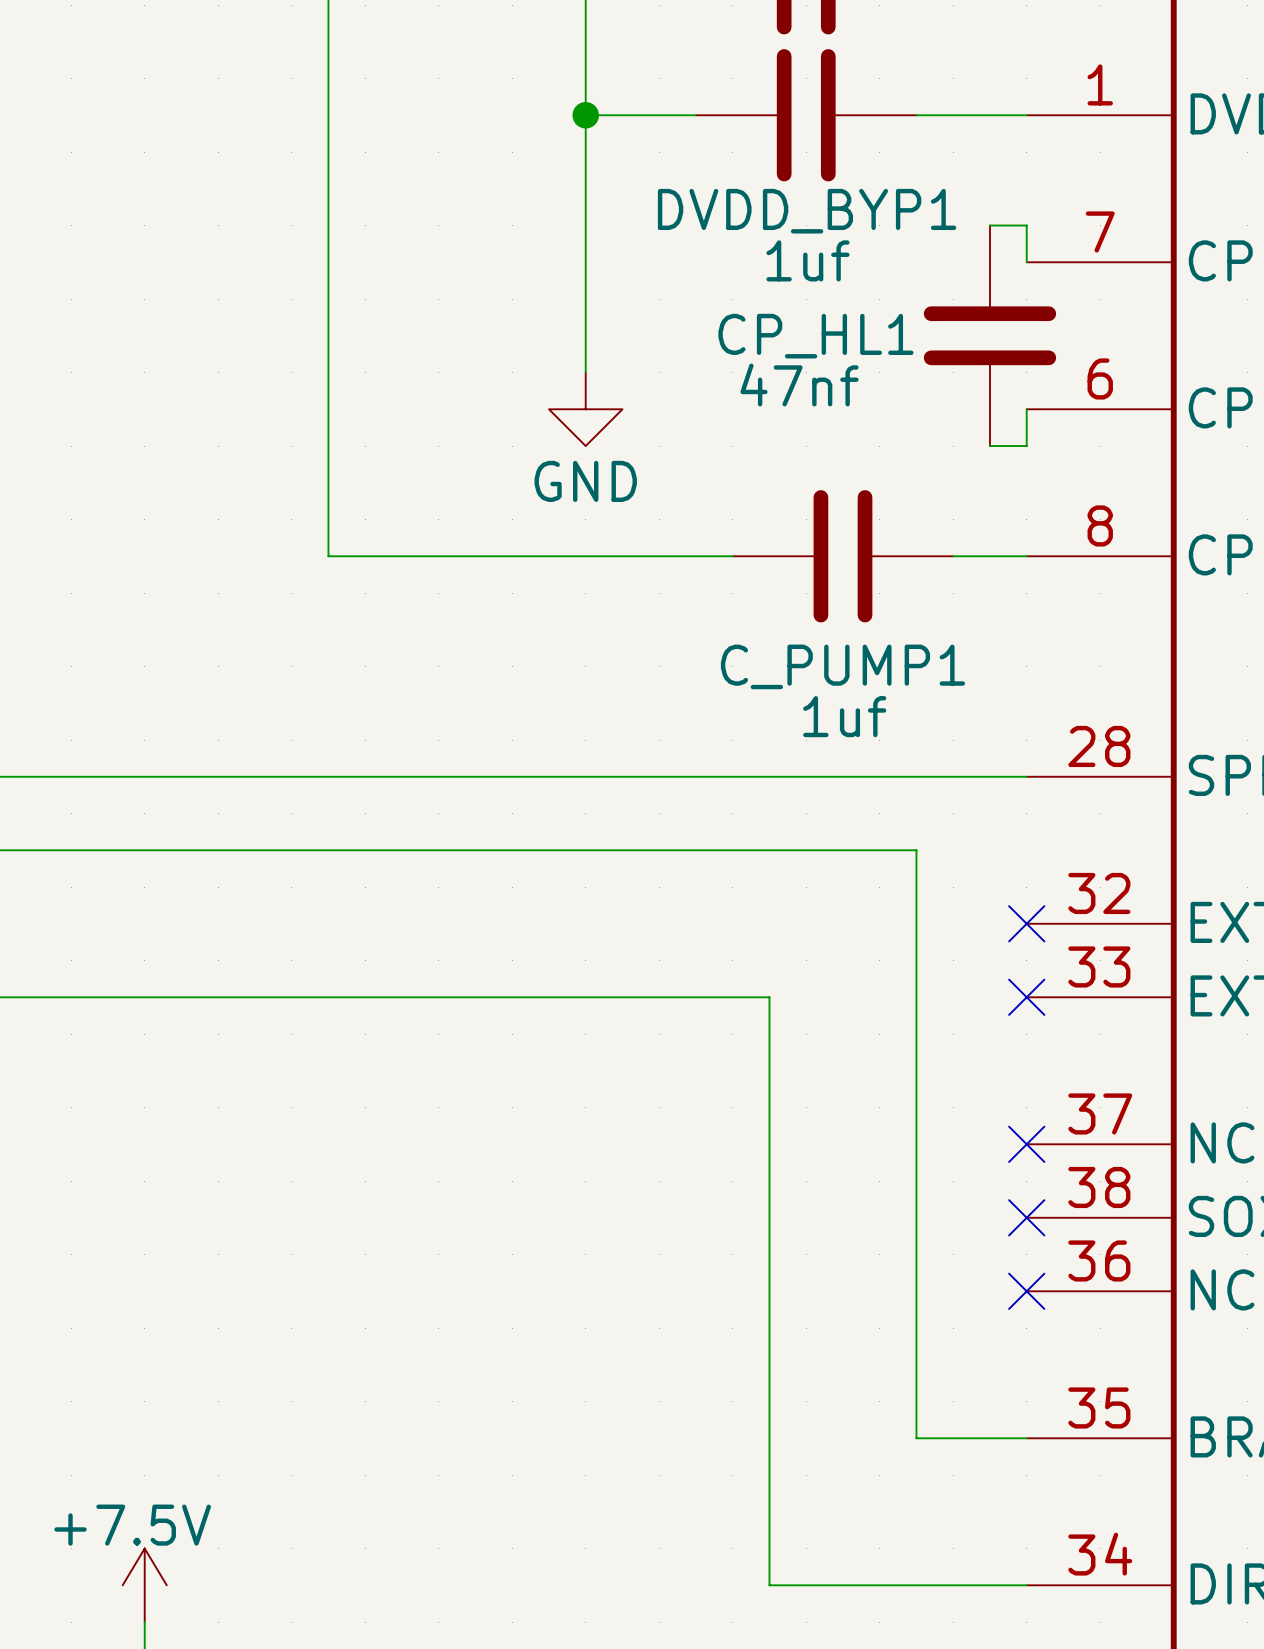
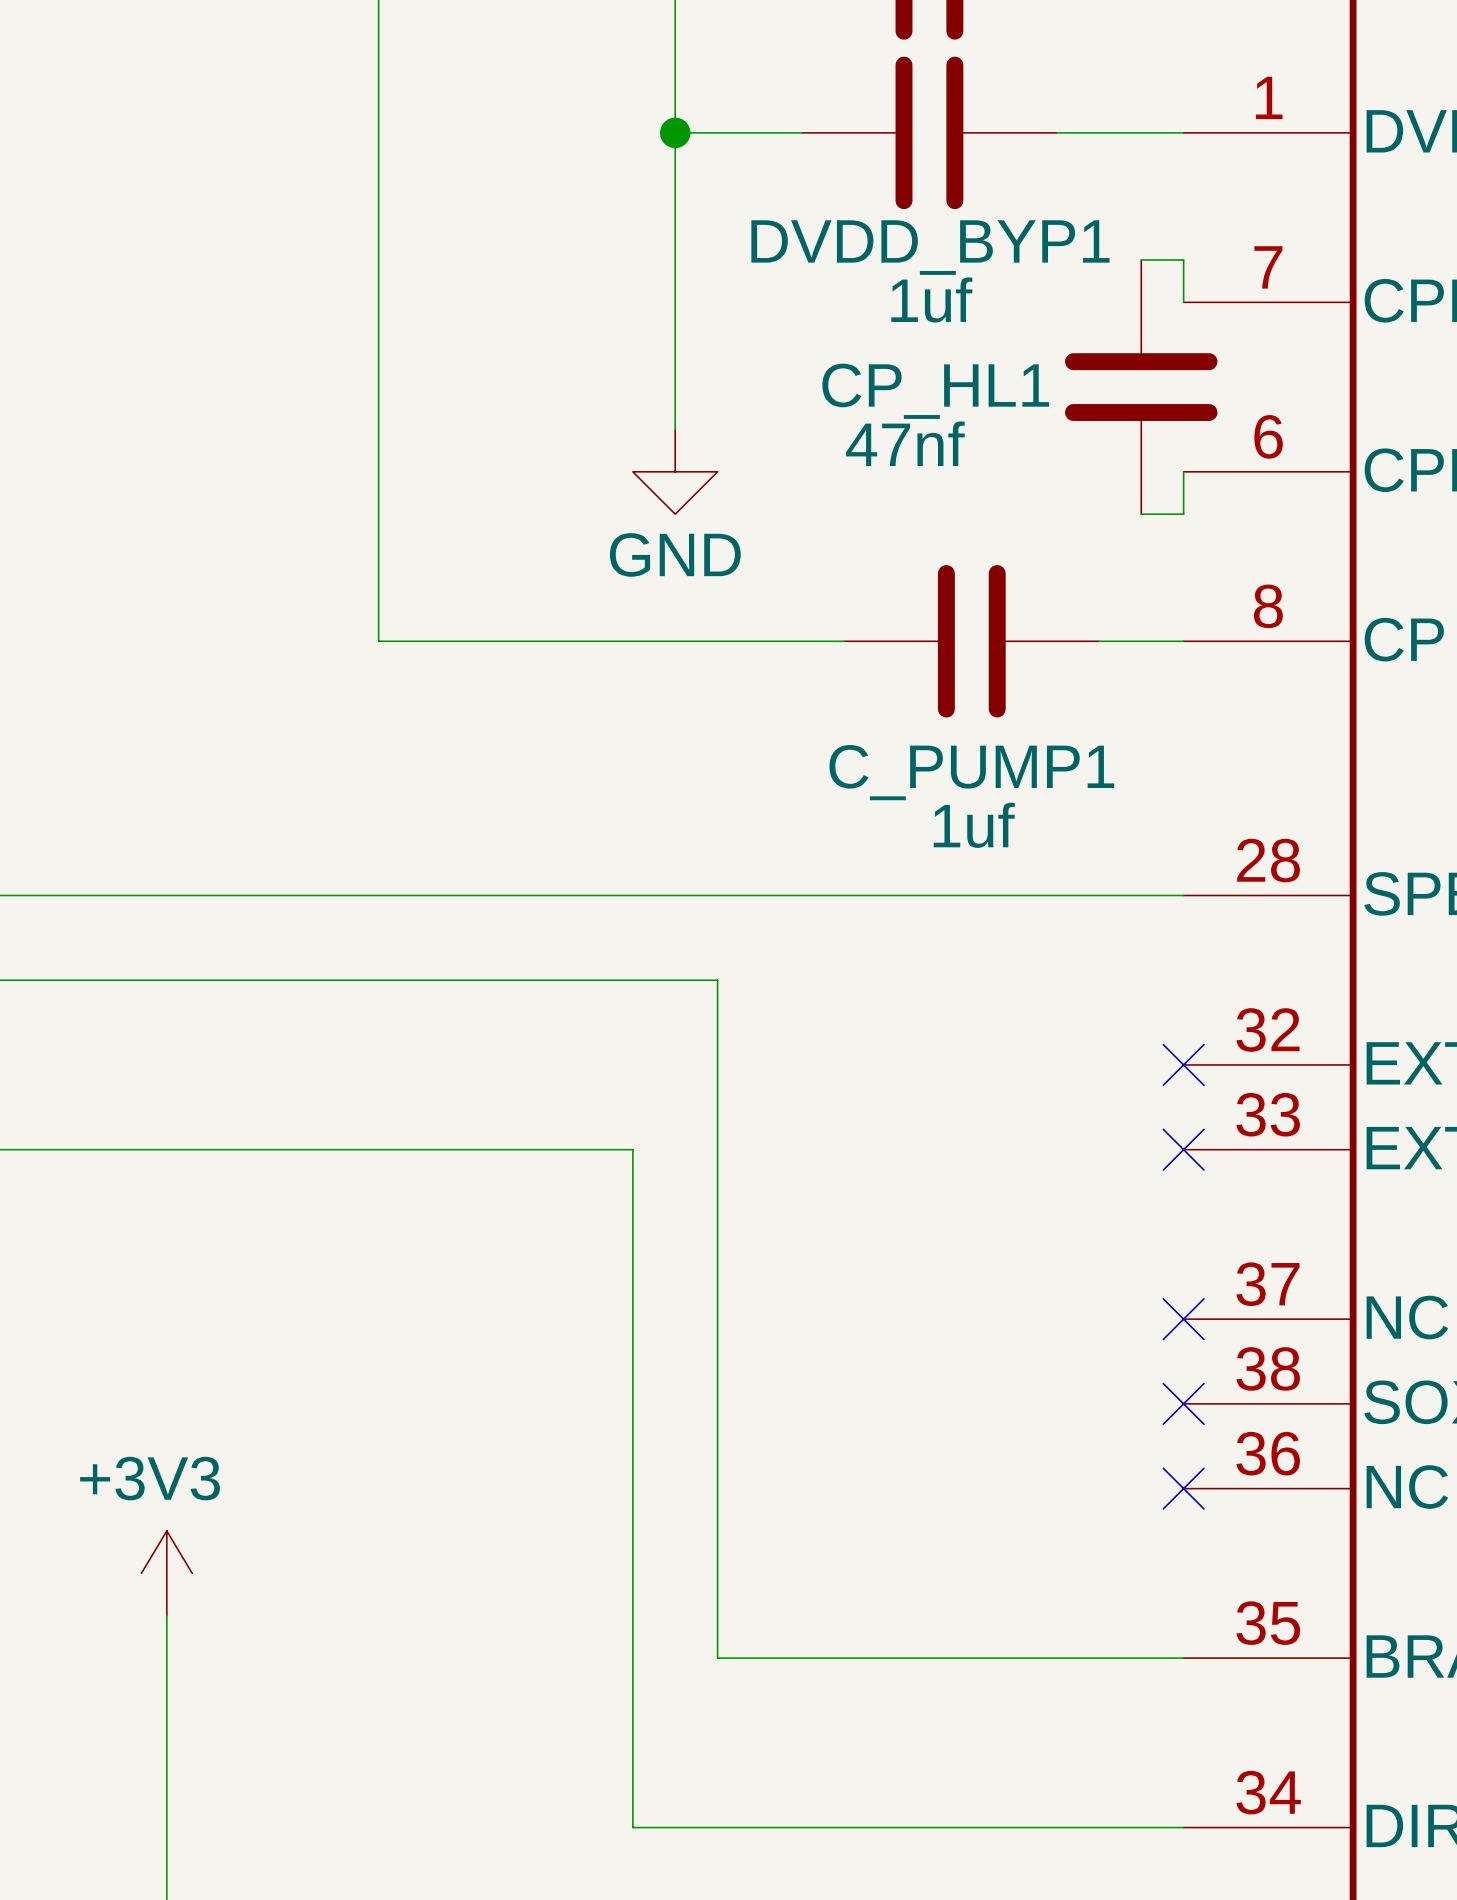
wire: (622, 850) (916, 850) (916, 1438) -> (717, 980) (717, 1658) (1056, 1658)
wire: (548, 997) (769, 997) (769, 1585) -> (632, 1149) (632, 1827) (887, 1827)
power symbol: none -> +3V3 (166, 1573)
wire: none -> (166, 1615) (166, 1869)
power symbol: +7.5V (144, 1585) -> none

